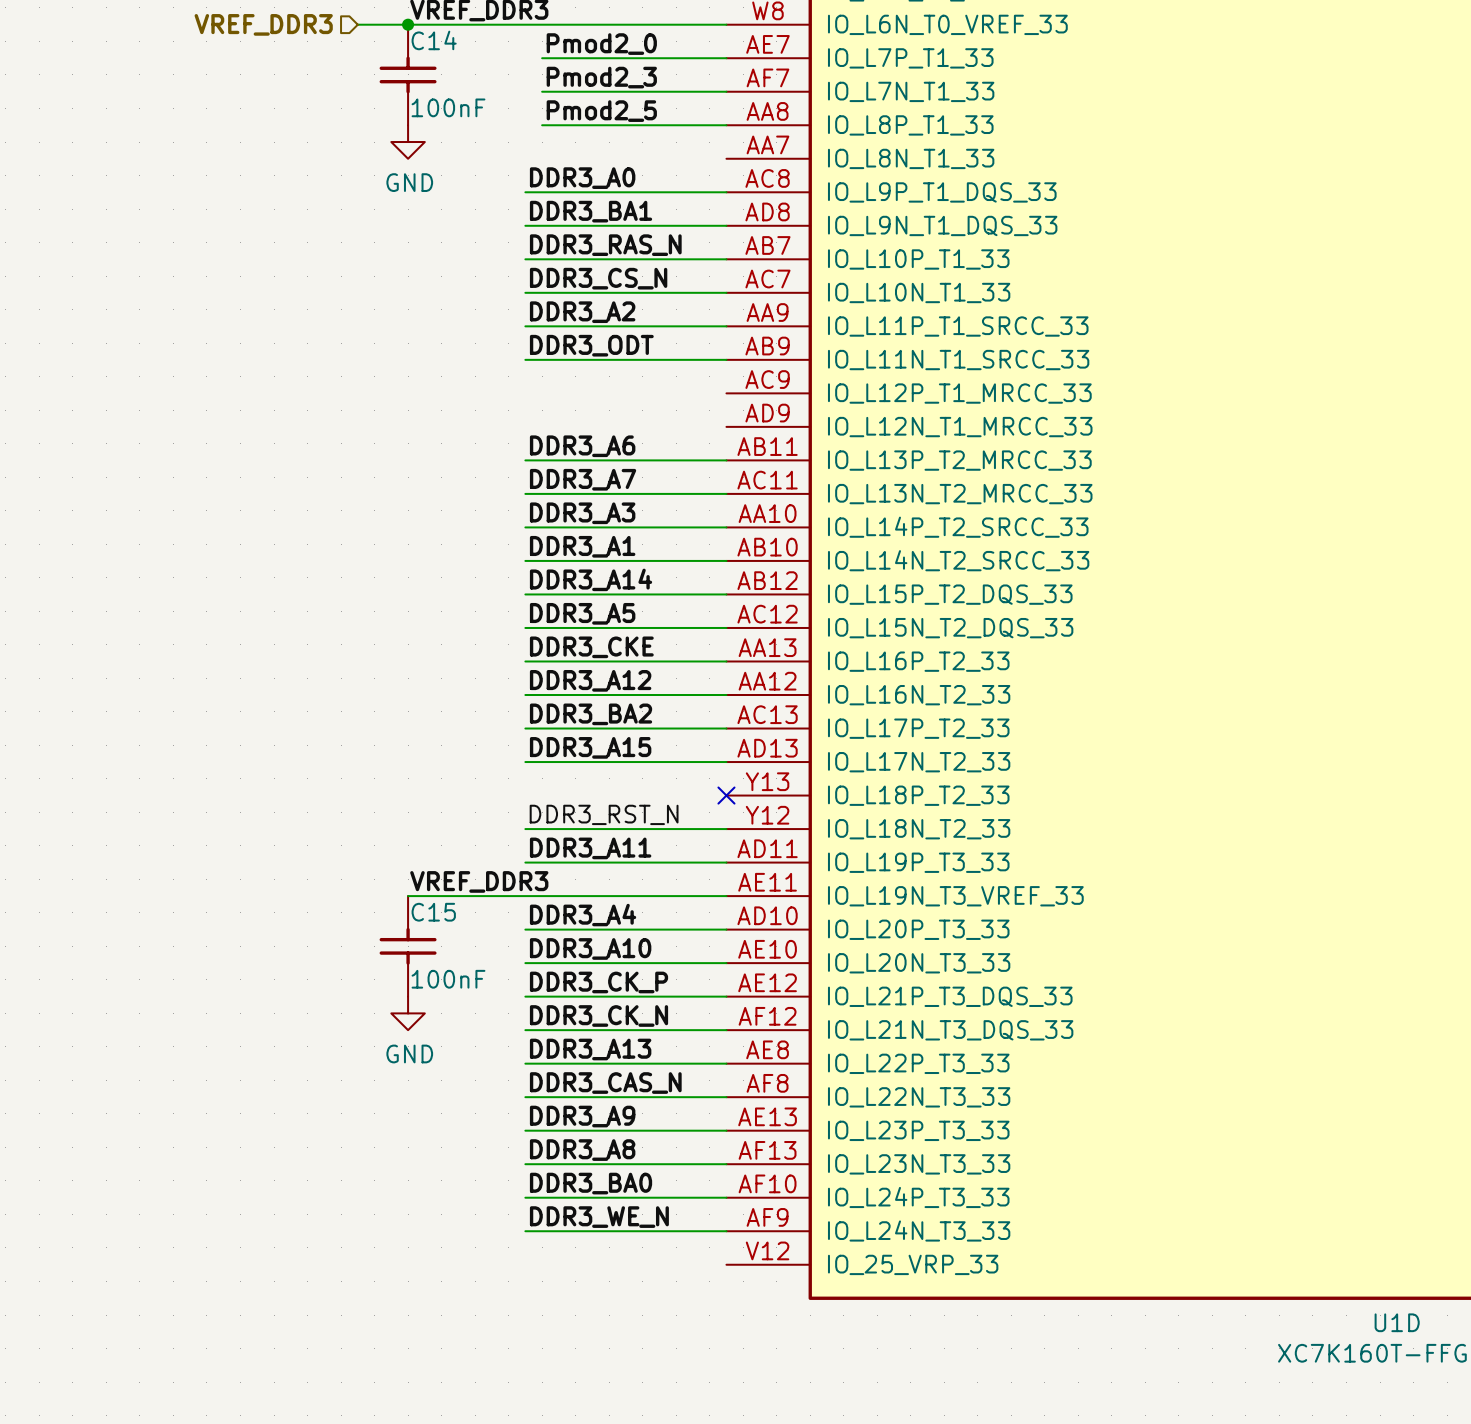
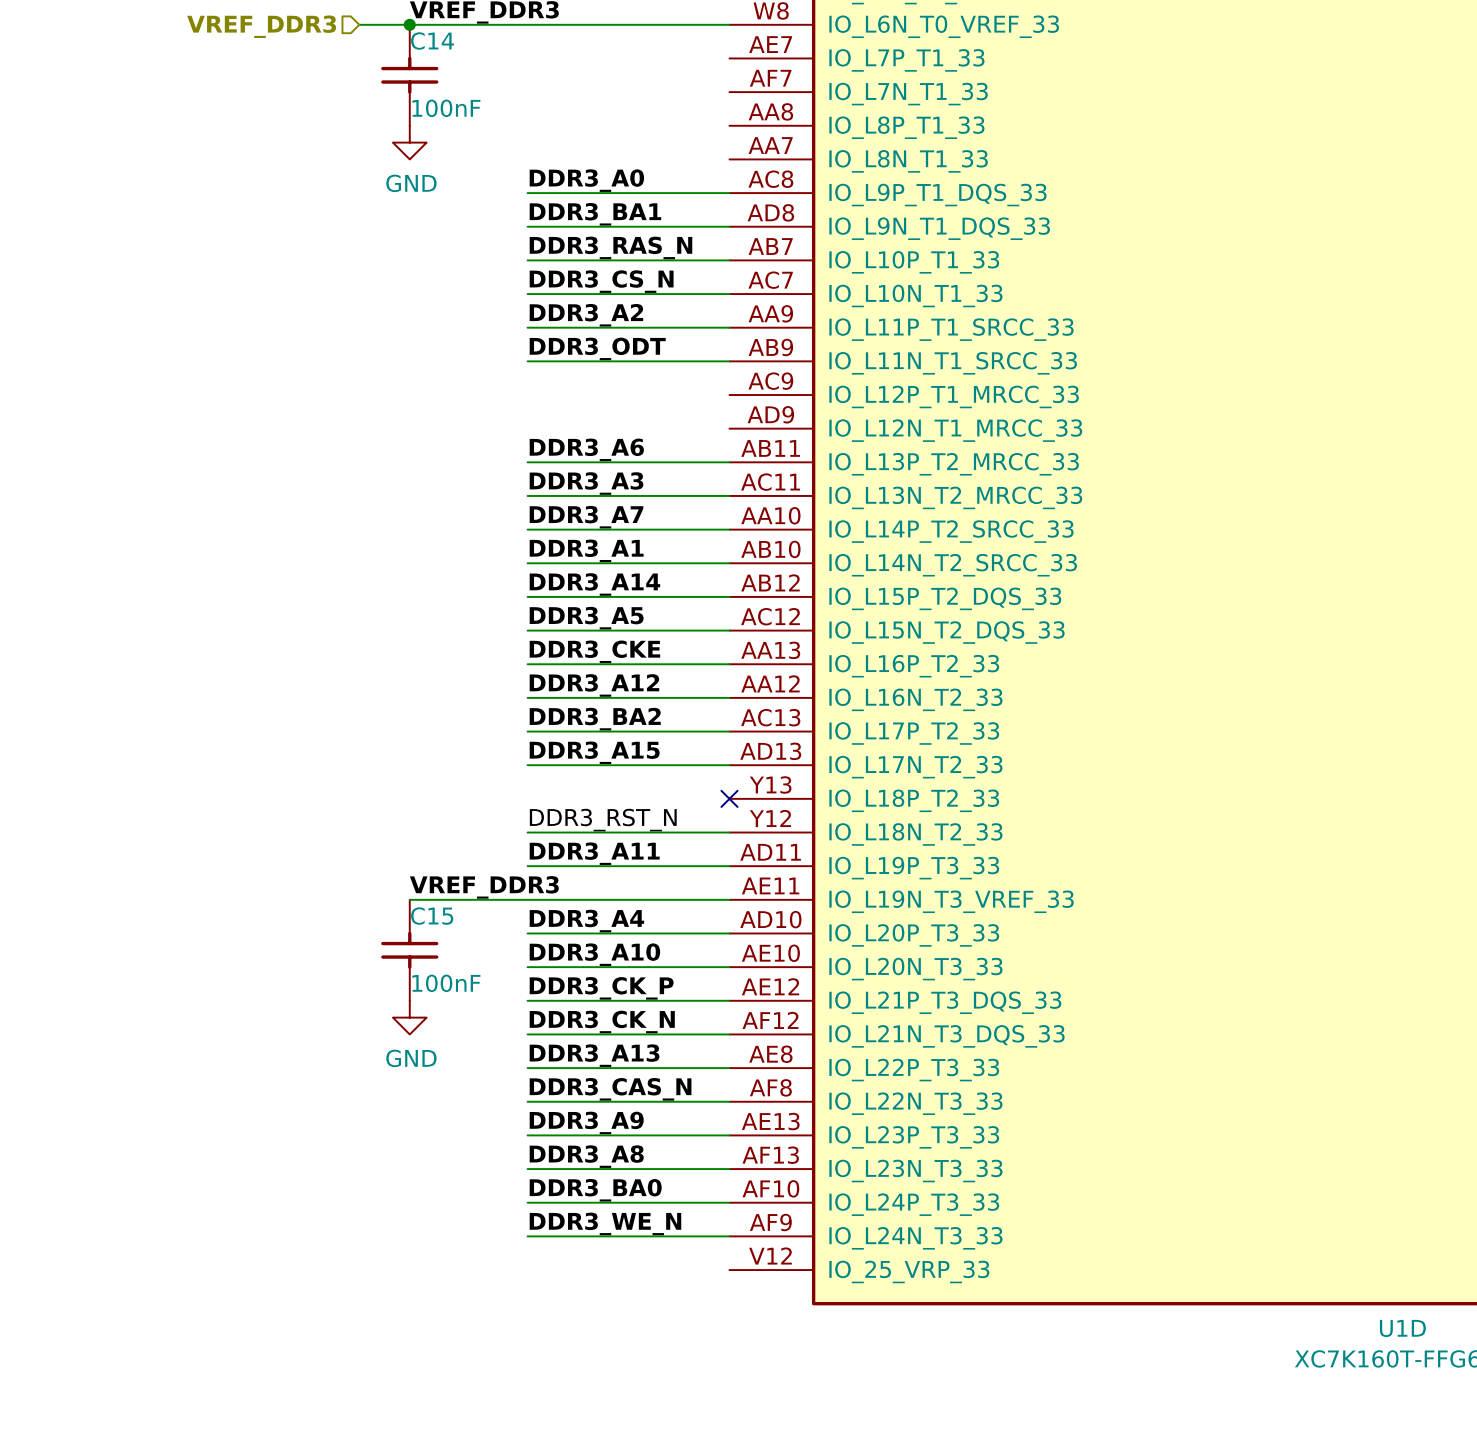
label: Pmod2_0 (601, 44) -> none
wire: (542, 58) (726, 58) -> none
label: Pmod2_3 (601, 77) -> none
wire: (542, 91) (726, 91) -> none
label: Pmod2_5 (601, 111) -> none
wire: (542, 125) (726, 125) -> none
label: DDR3_A7 (583, 479) -> DDR3_A3 (586, 483)
label: DDR3_A3 (582, 513) -> DDR3_A7 (586, 517)

